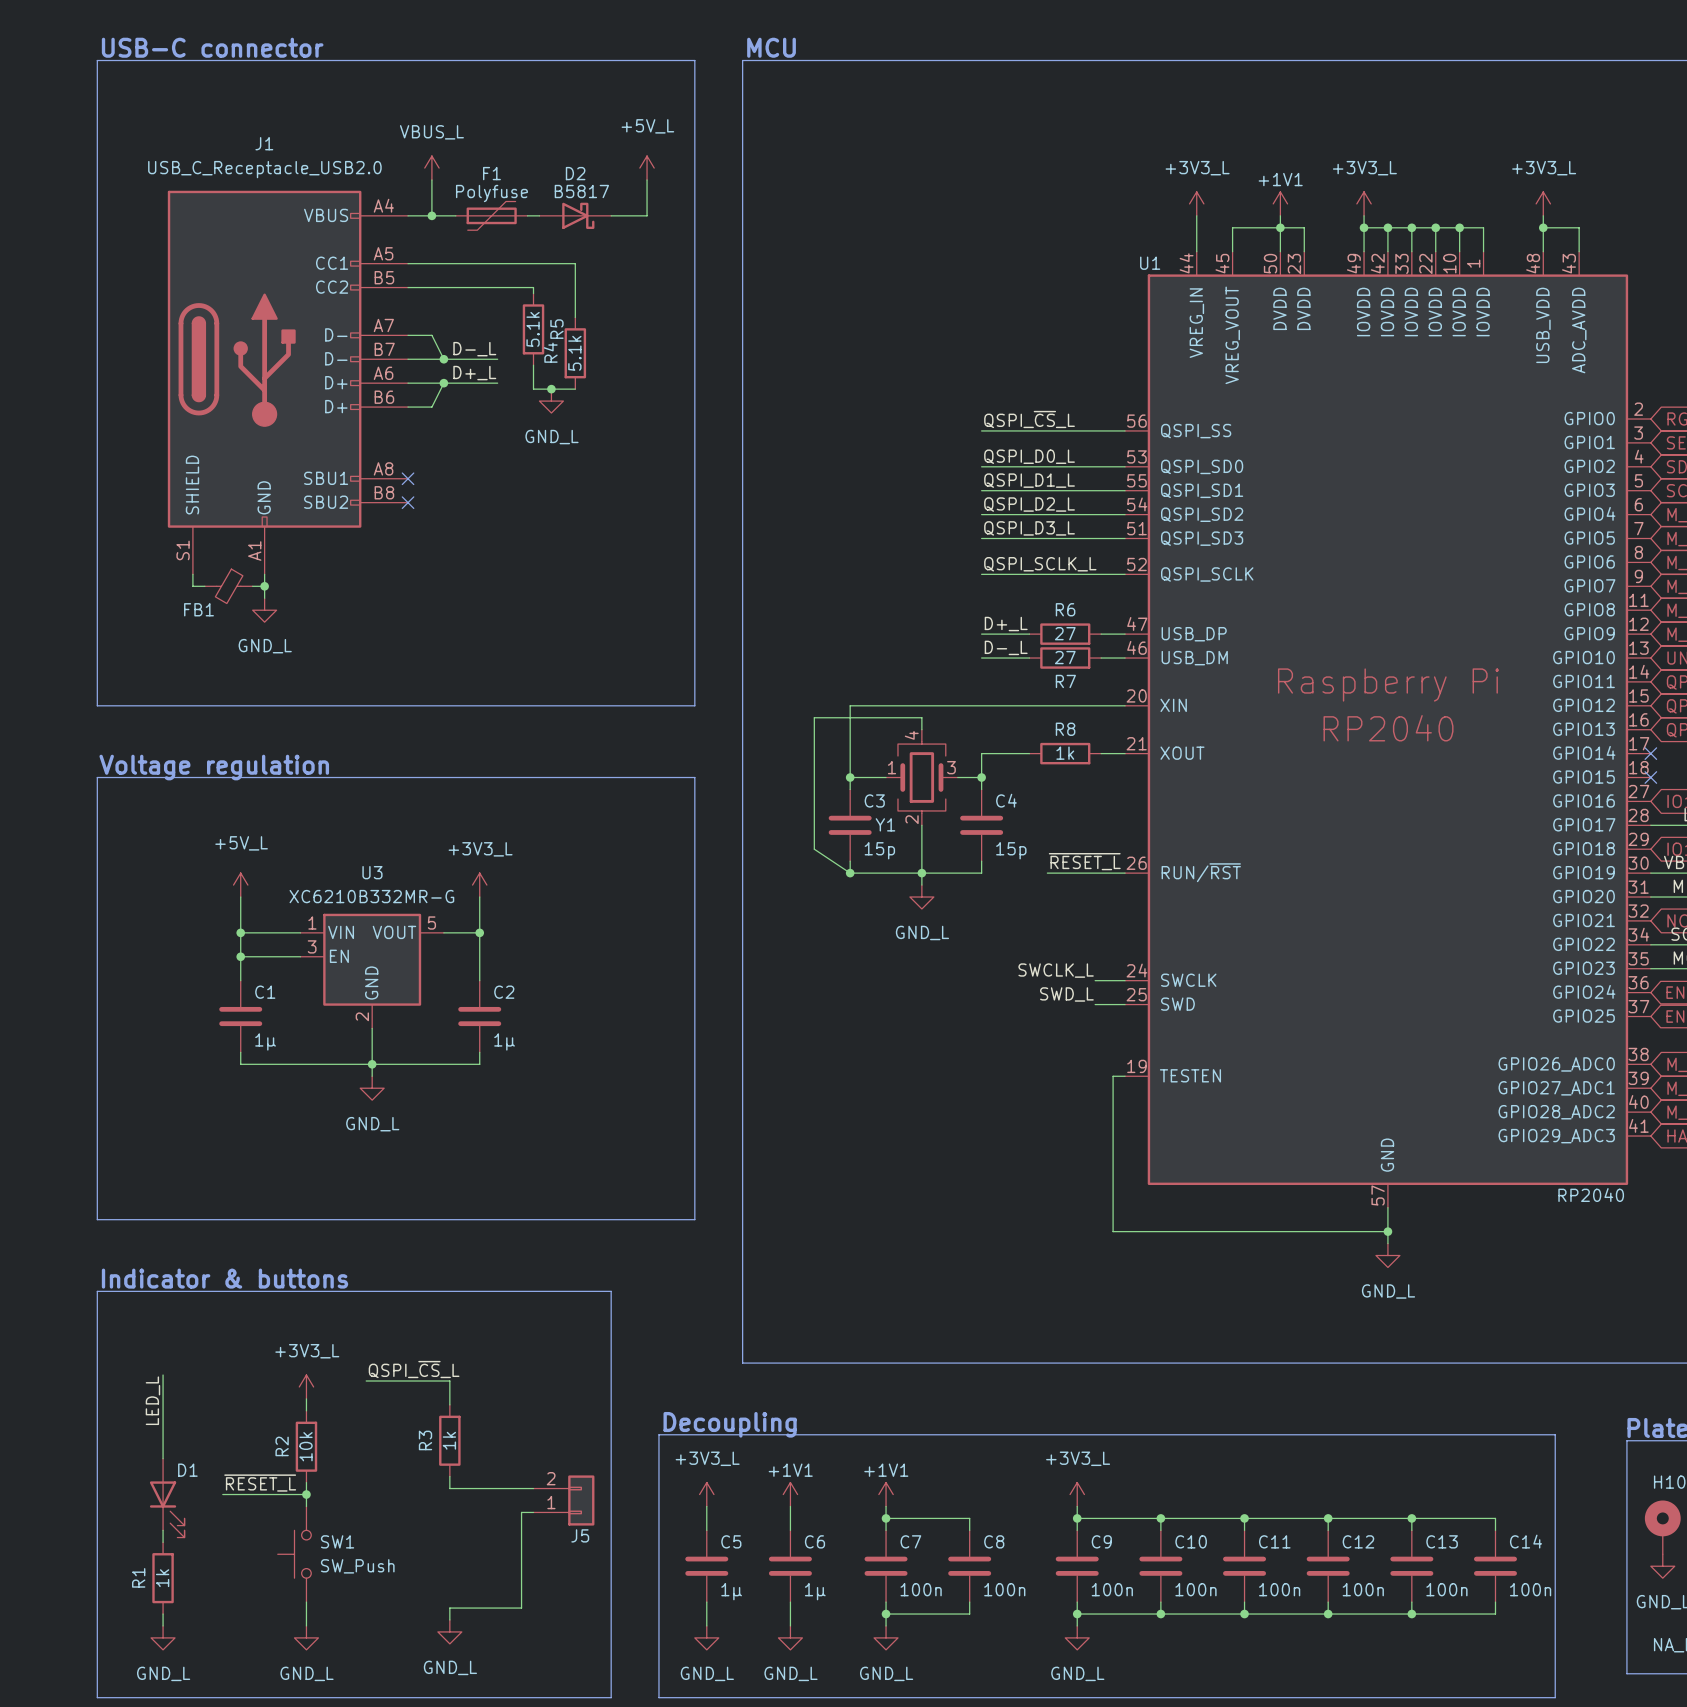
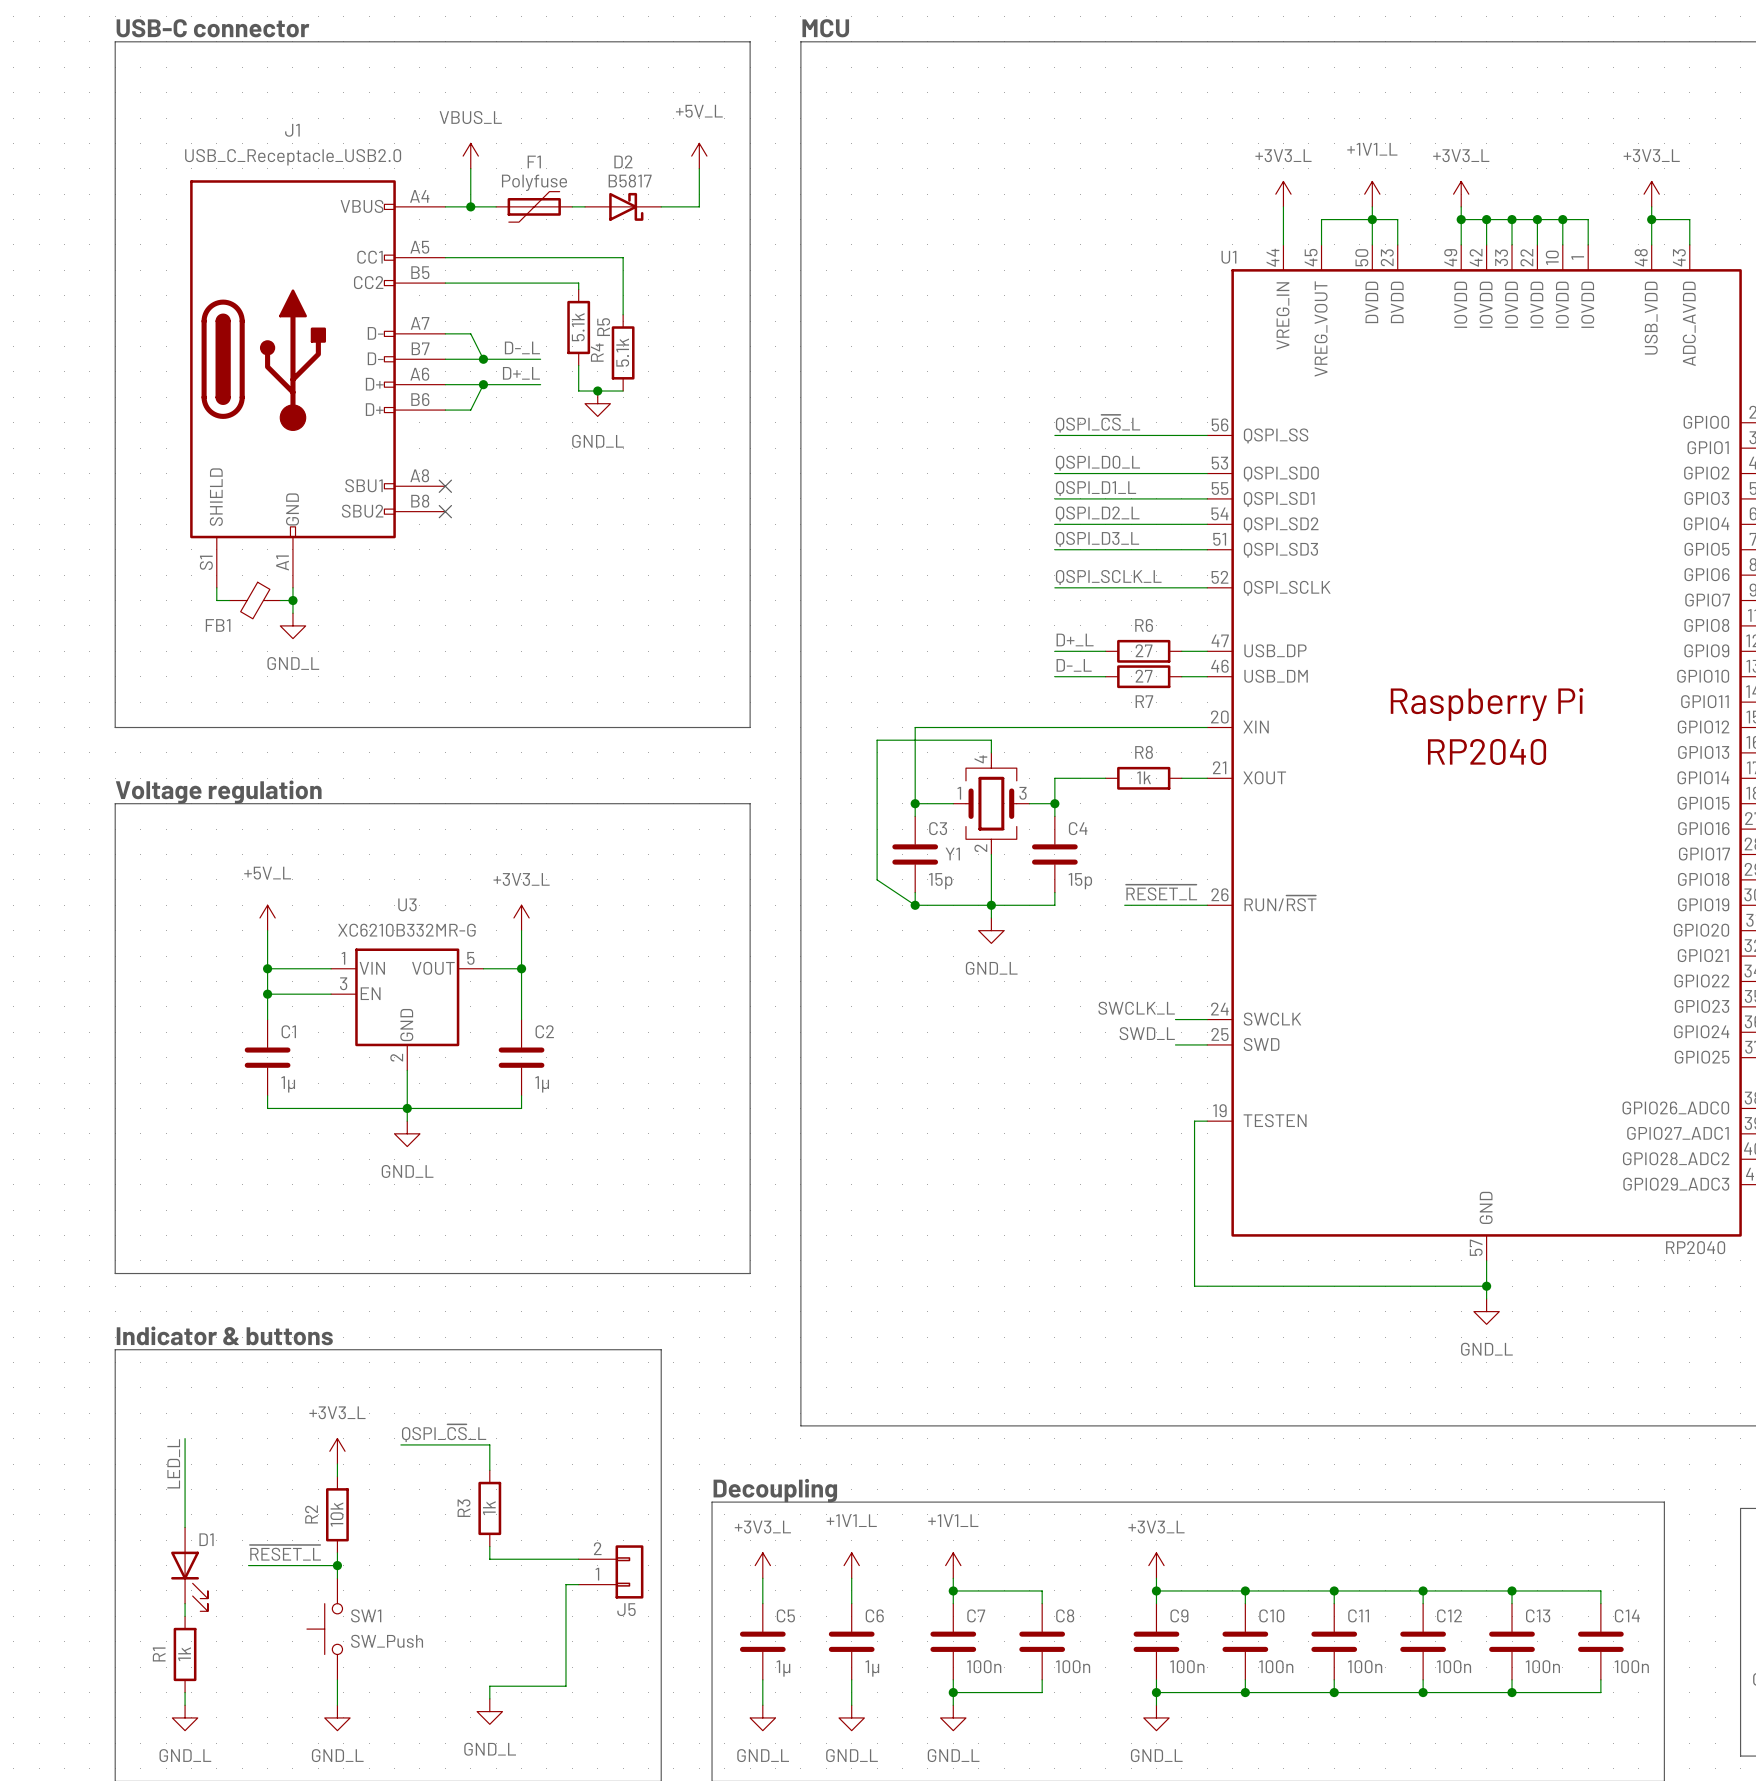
power symbol: +1V1 (1280, 203) -> +1V1_L (1372, 194)
power symbol: +1V1 (790, 1494) -> +1V1_L (851, 1565)
power symbol: +1V1 (886, 1494) -> +1V1_L (953, 1565)

